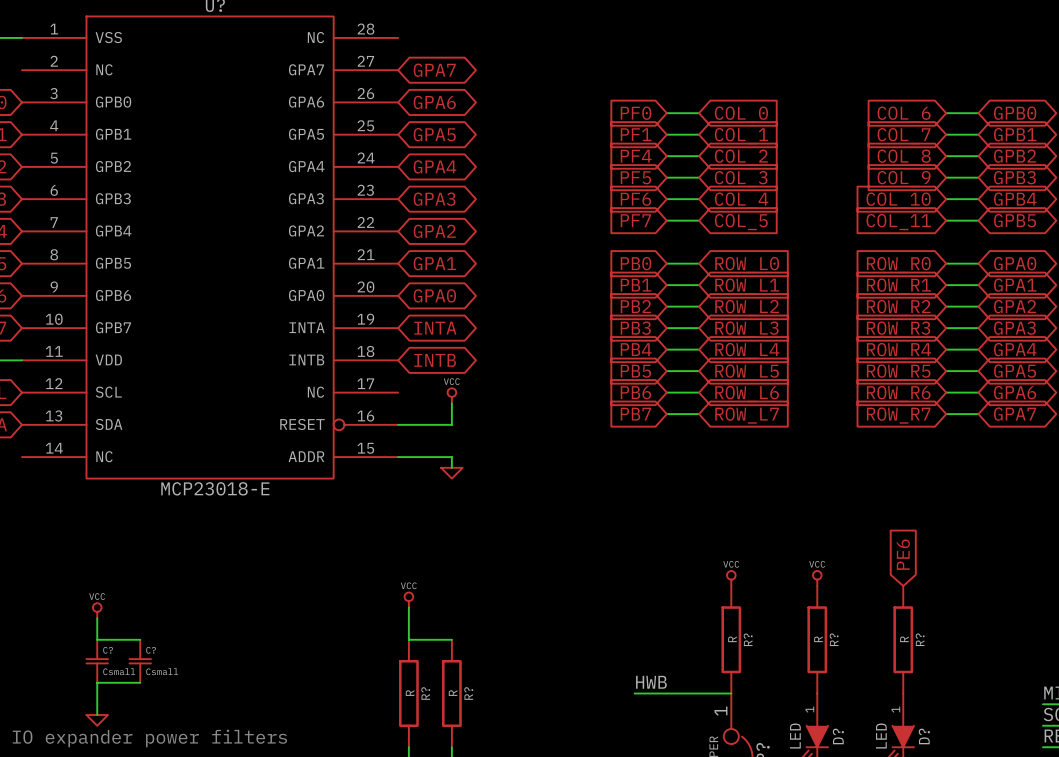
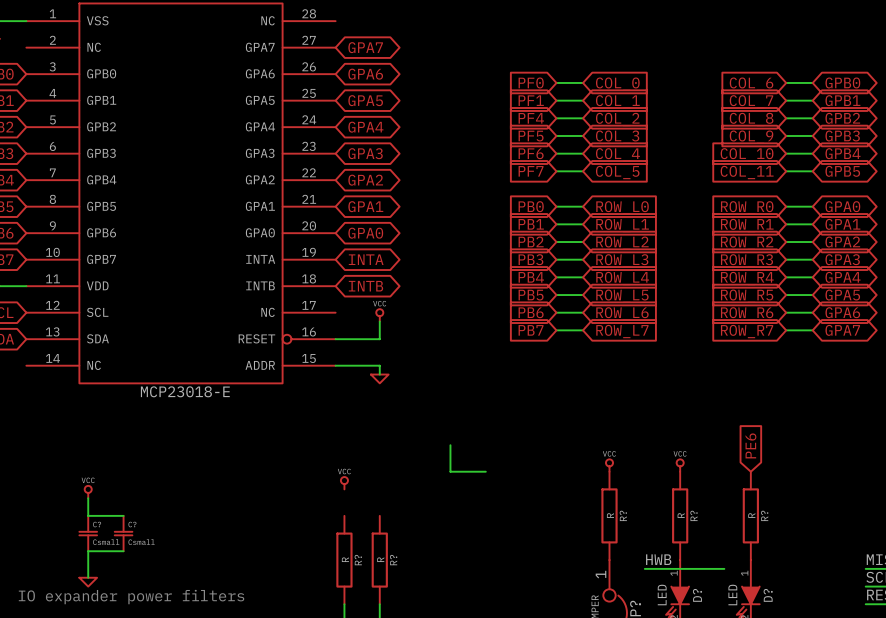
wire: (408, 607) (408, 639) (451, 639) -> (450, 445) (450, 471) (485, 471)
label position: HWB (651, 682) -> HWB (658, 559)
wire: (634, 693) (731, 693) -> (644, 568) (724, 568)

